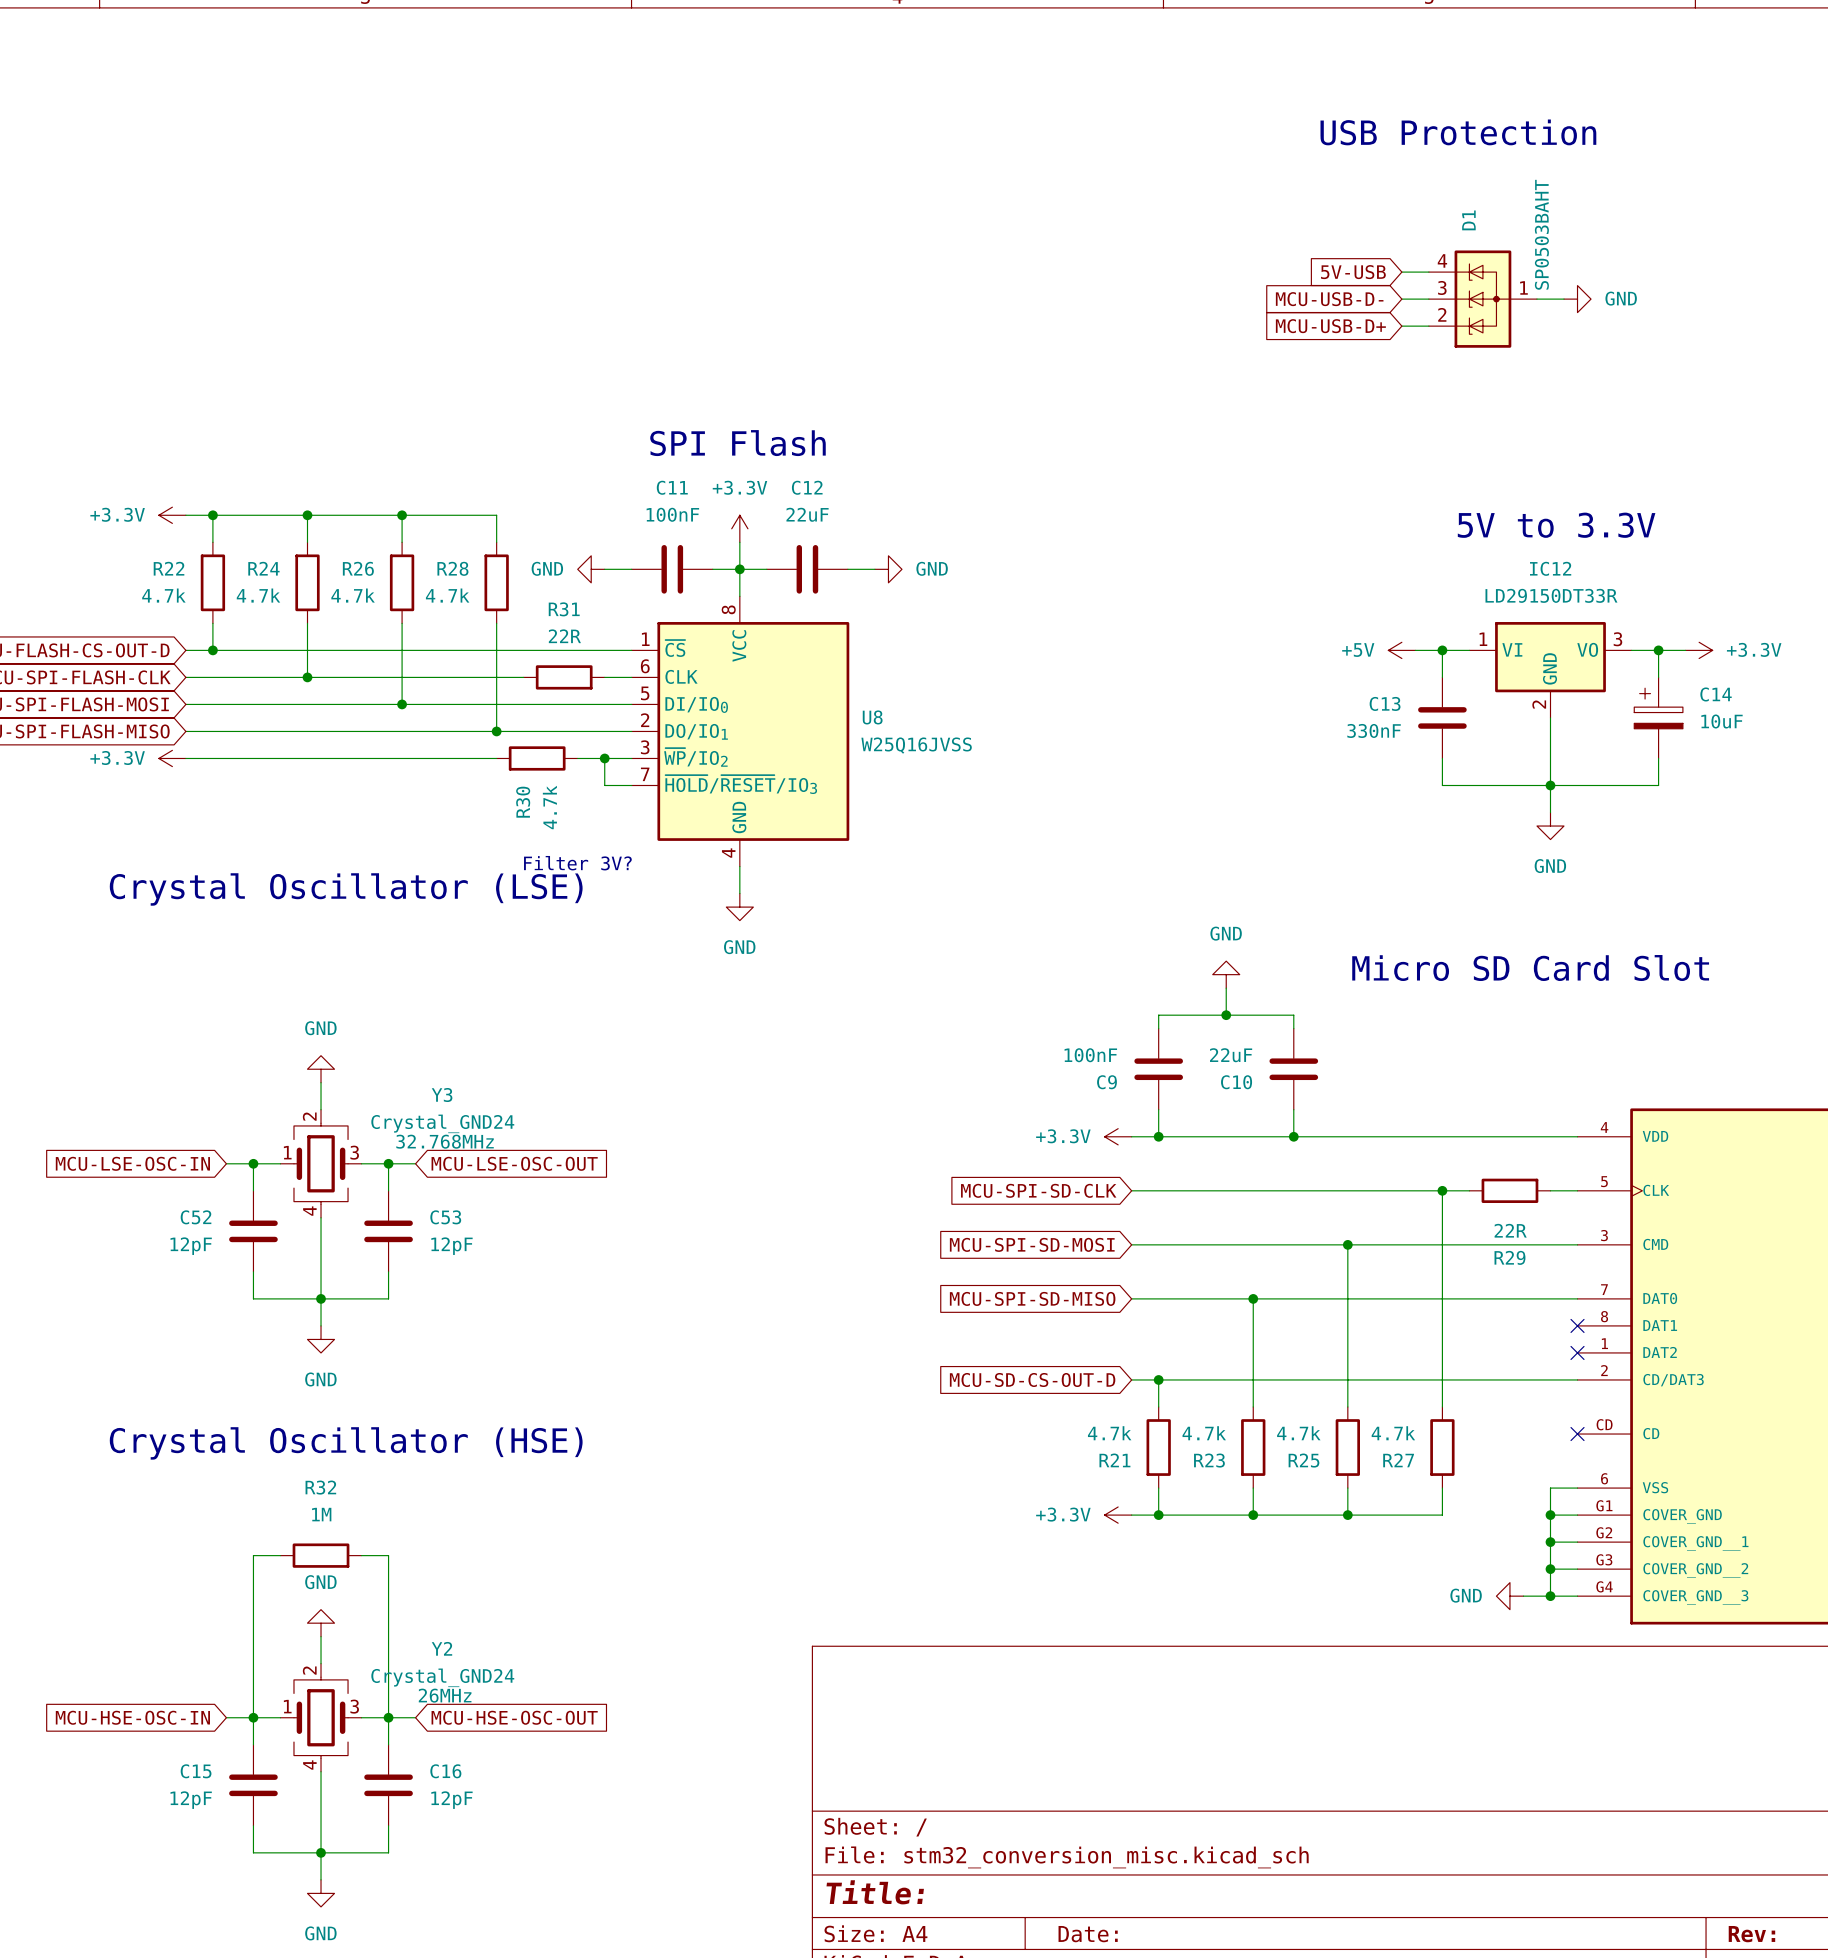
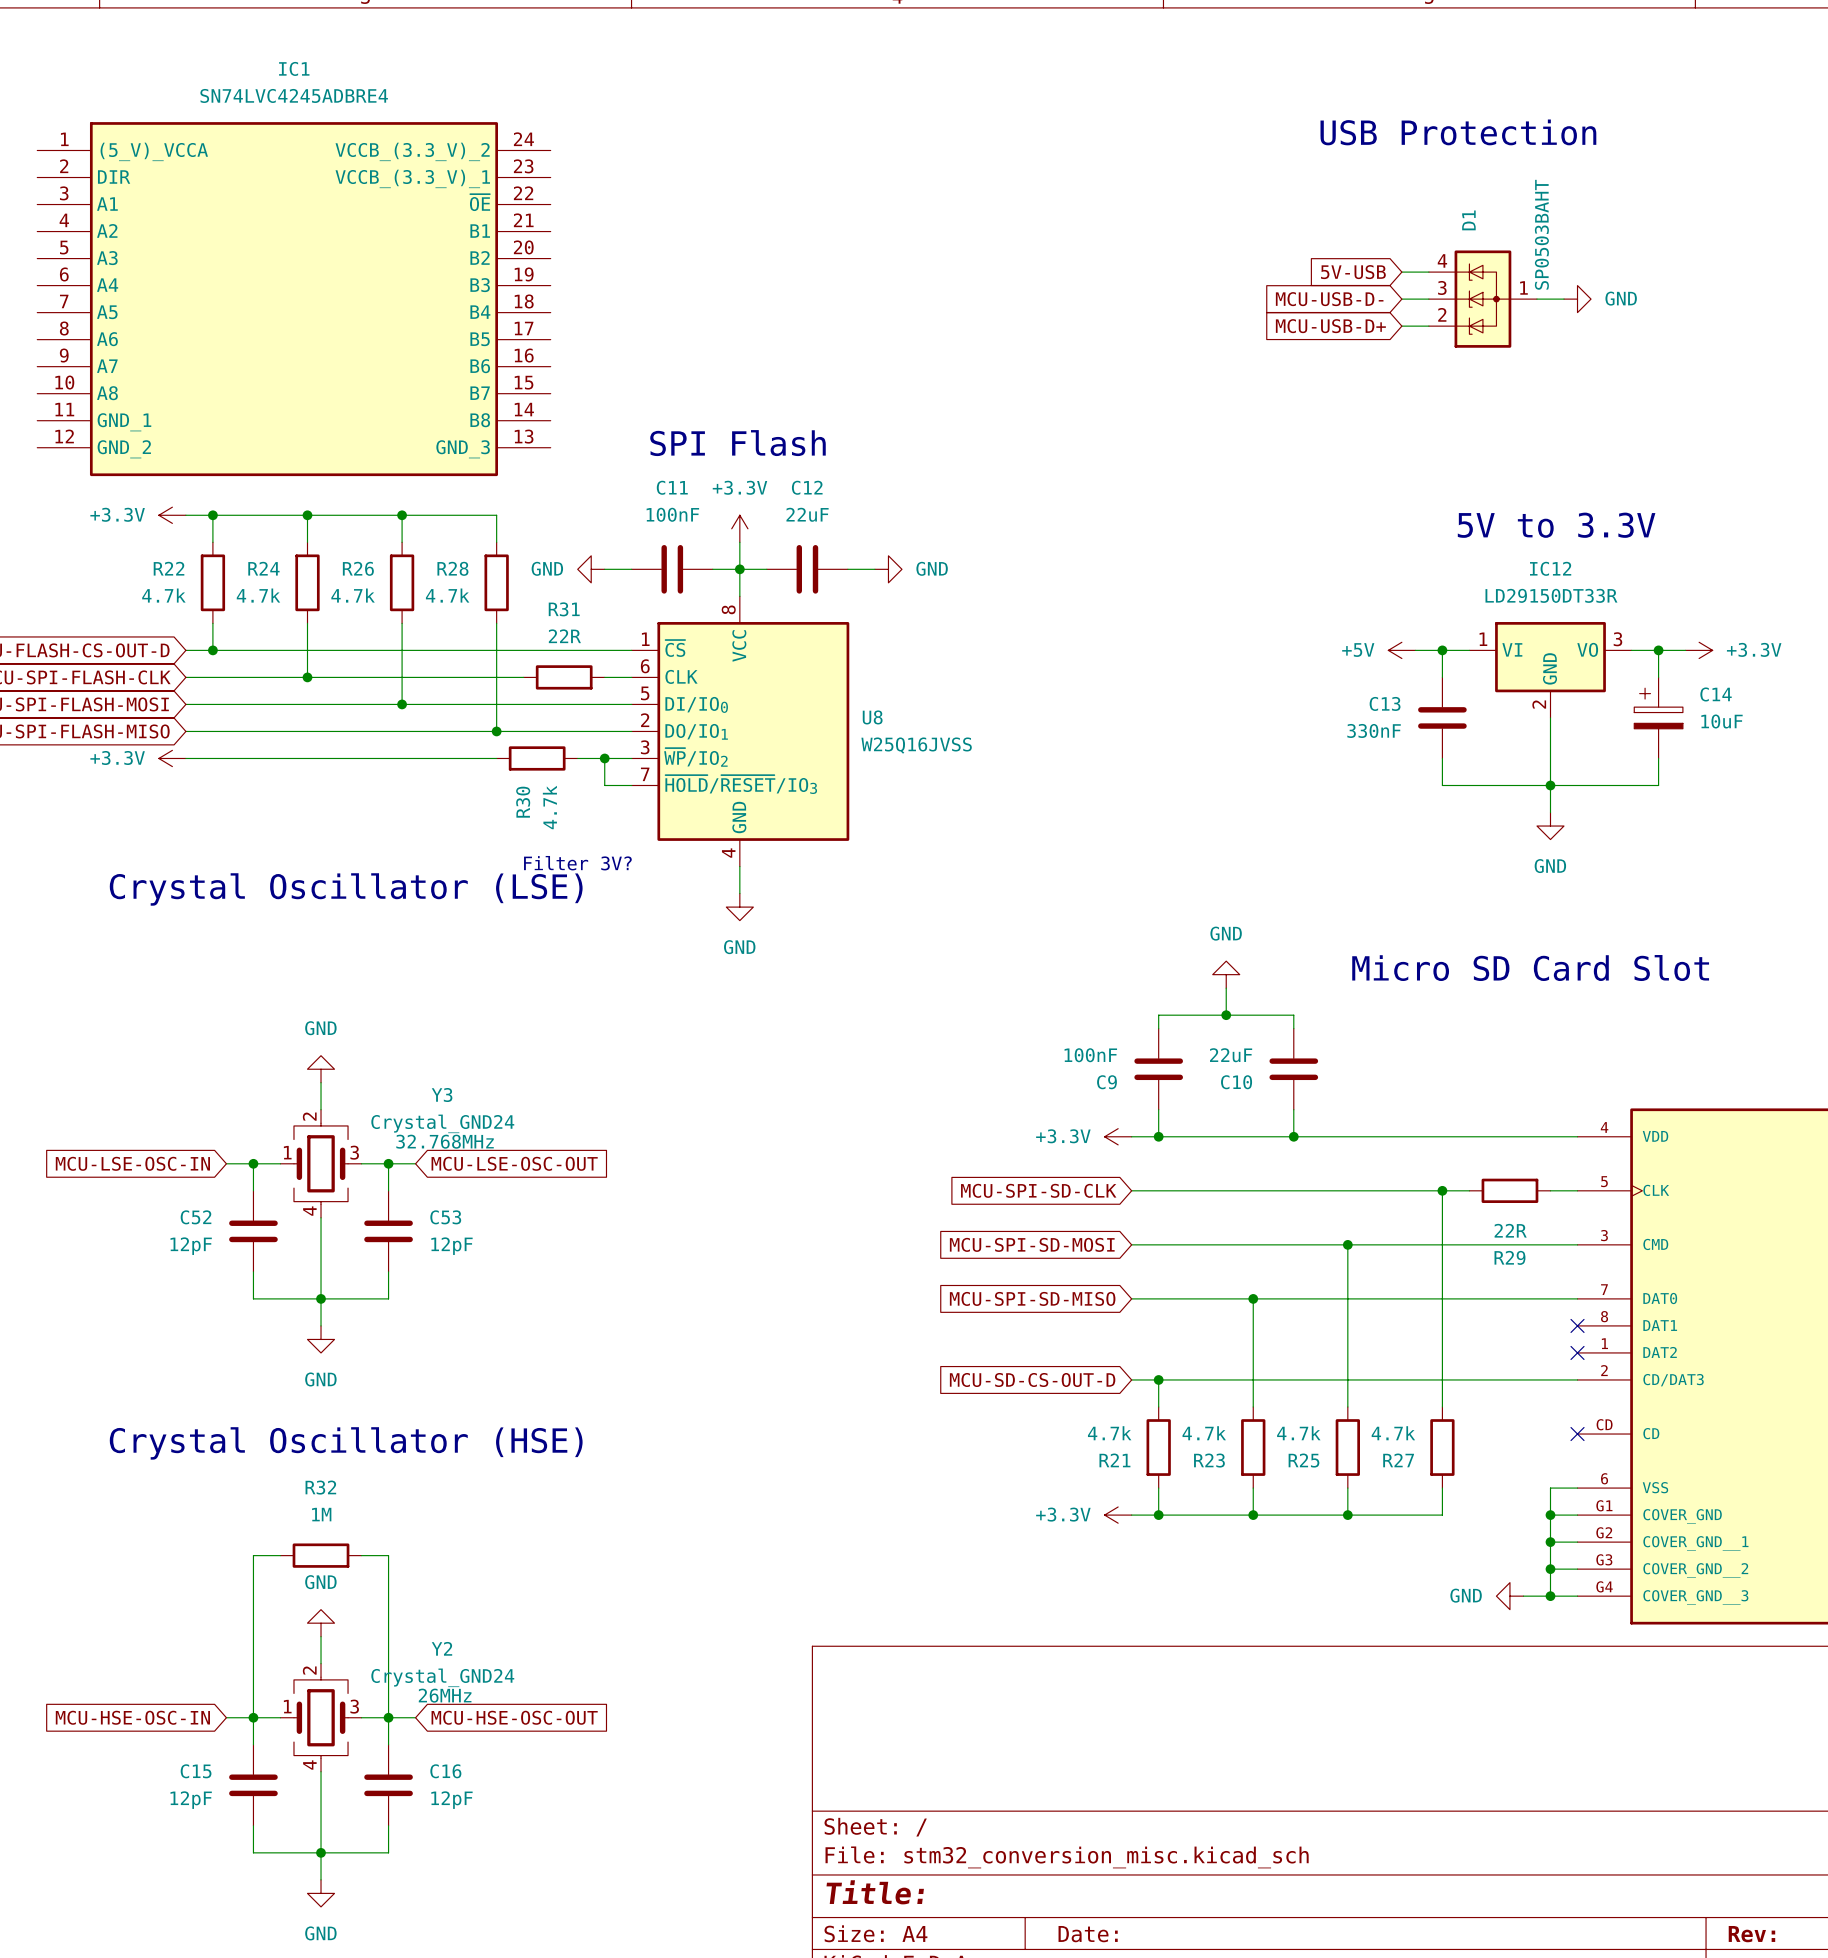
IC1: none -> SN74LVC4245ADBRE4 (293, 299)

